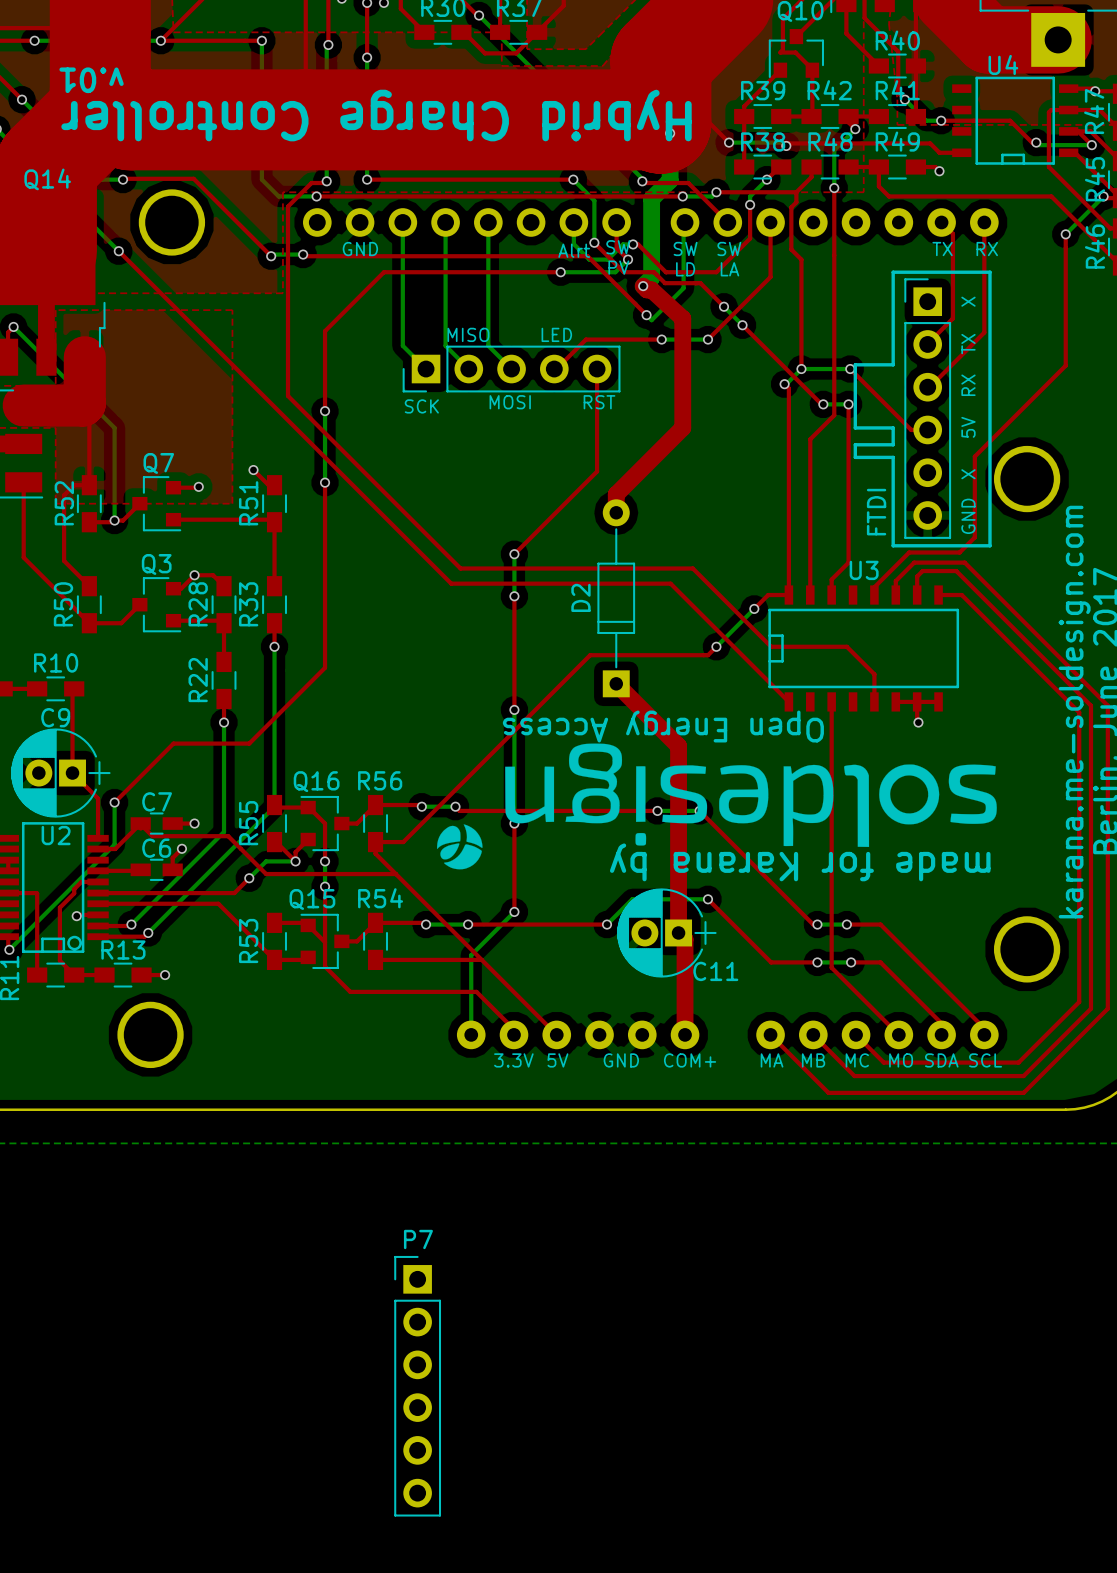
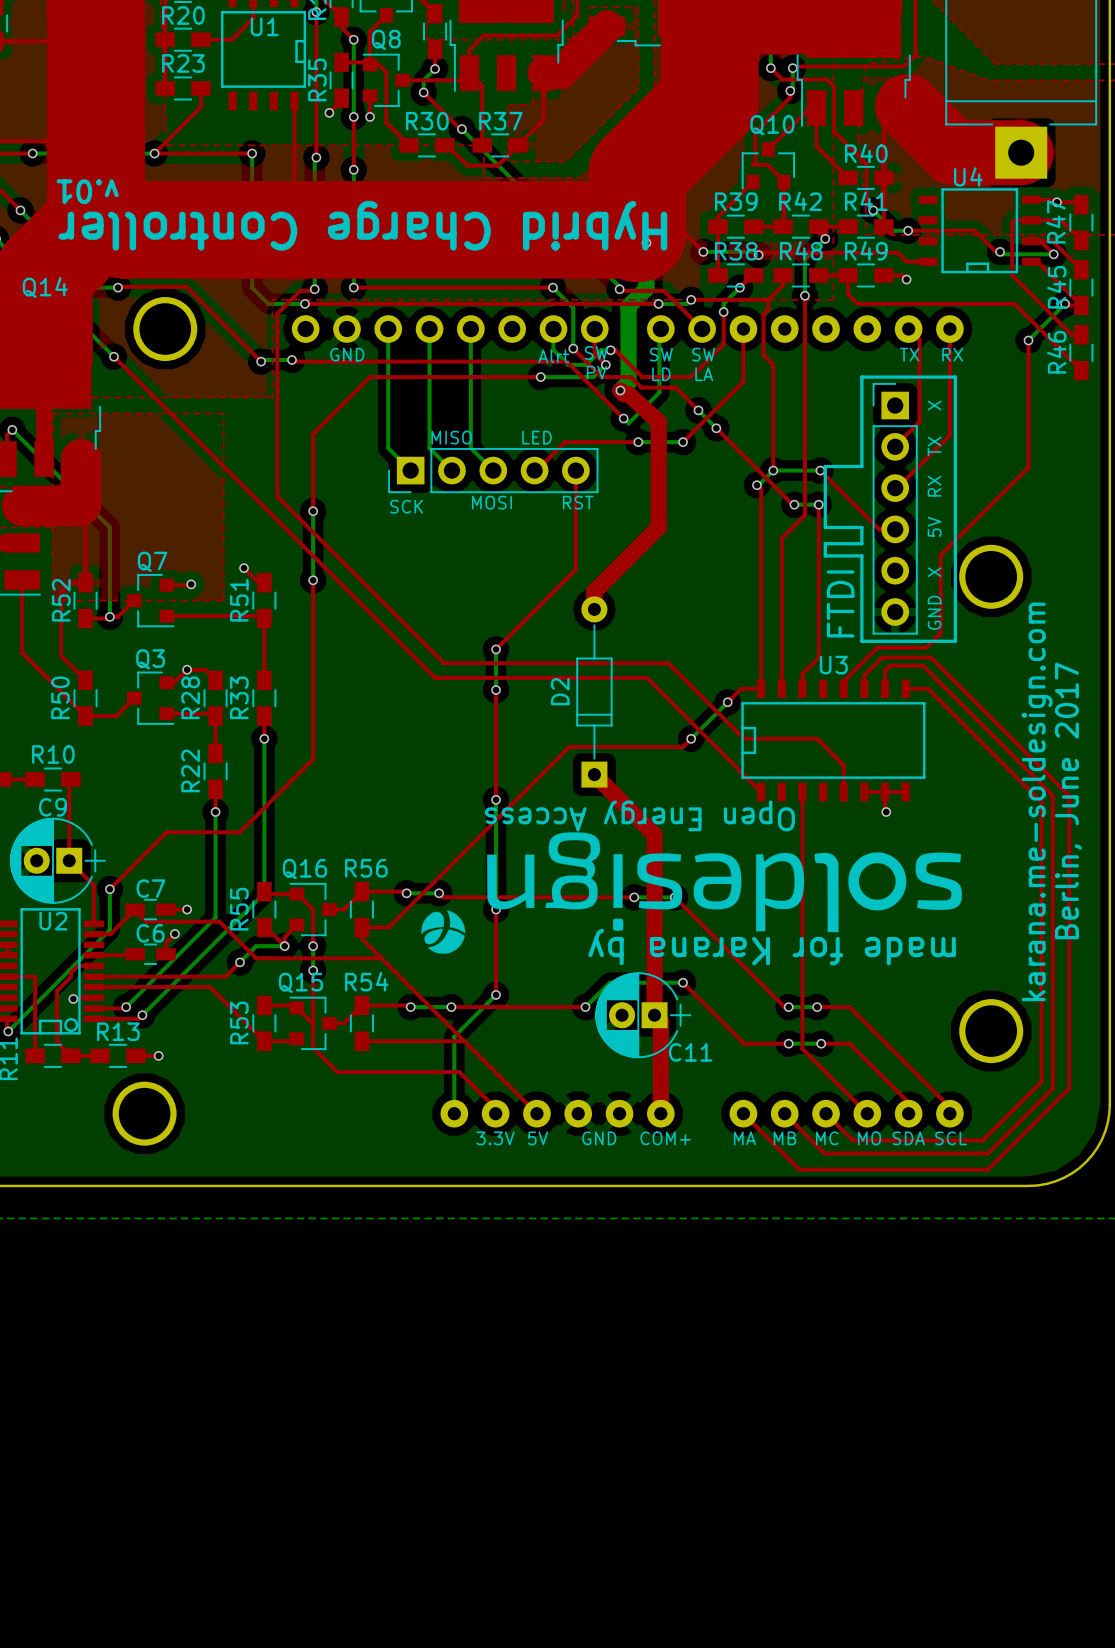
text: none -> FTDI (840, 603)
FTDI name: FTDI (876, 512) -> none
P7: (417, 1386) -> none

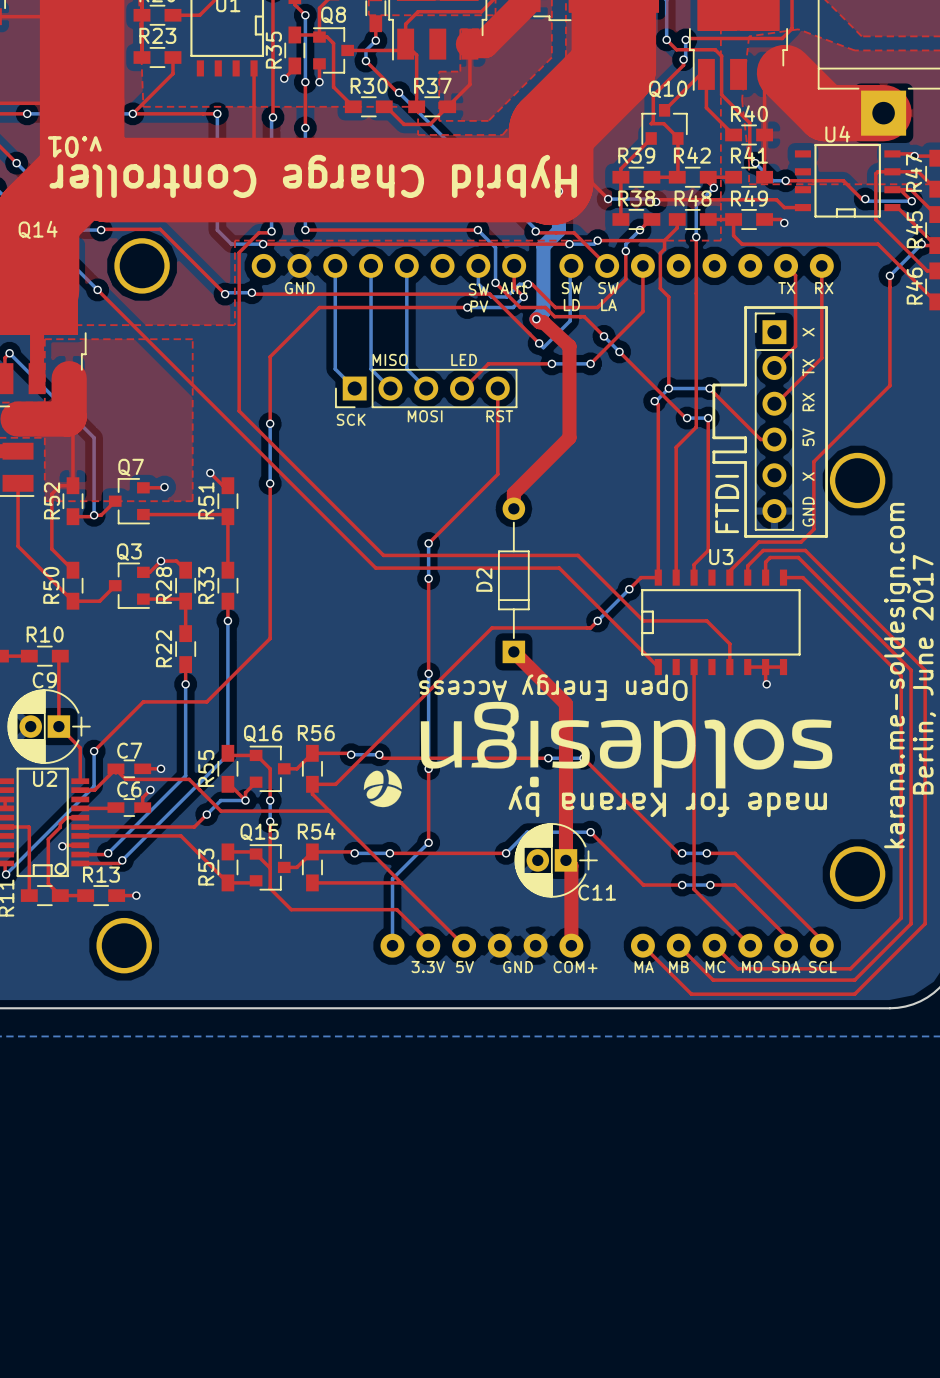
text: SW (596, 352) -> Alrt (513, 288)
text: Alrt (553, 356) -> SW (478, 289)
text position: PV (596, 372) -> PV (479, 306)

